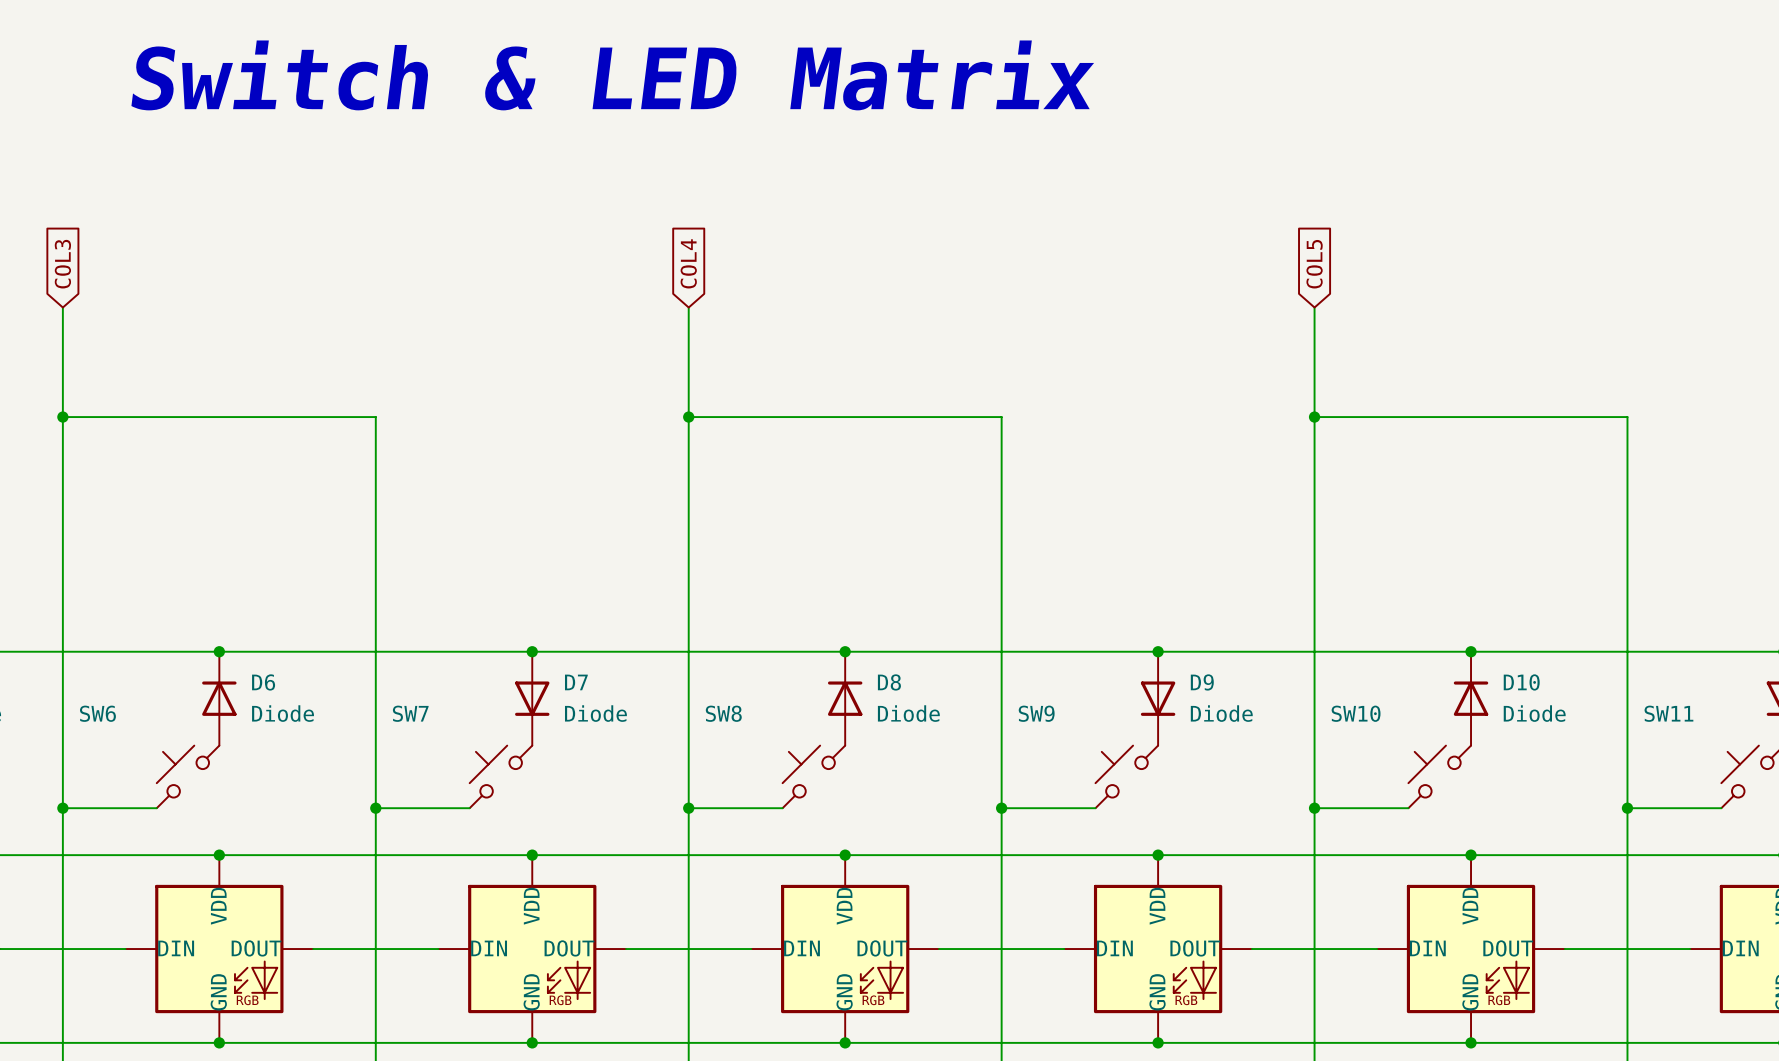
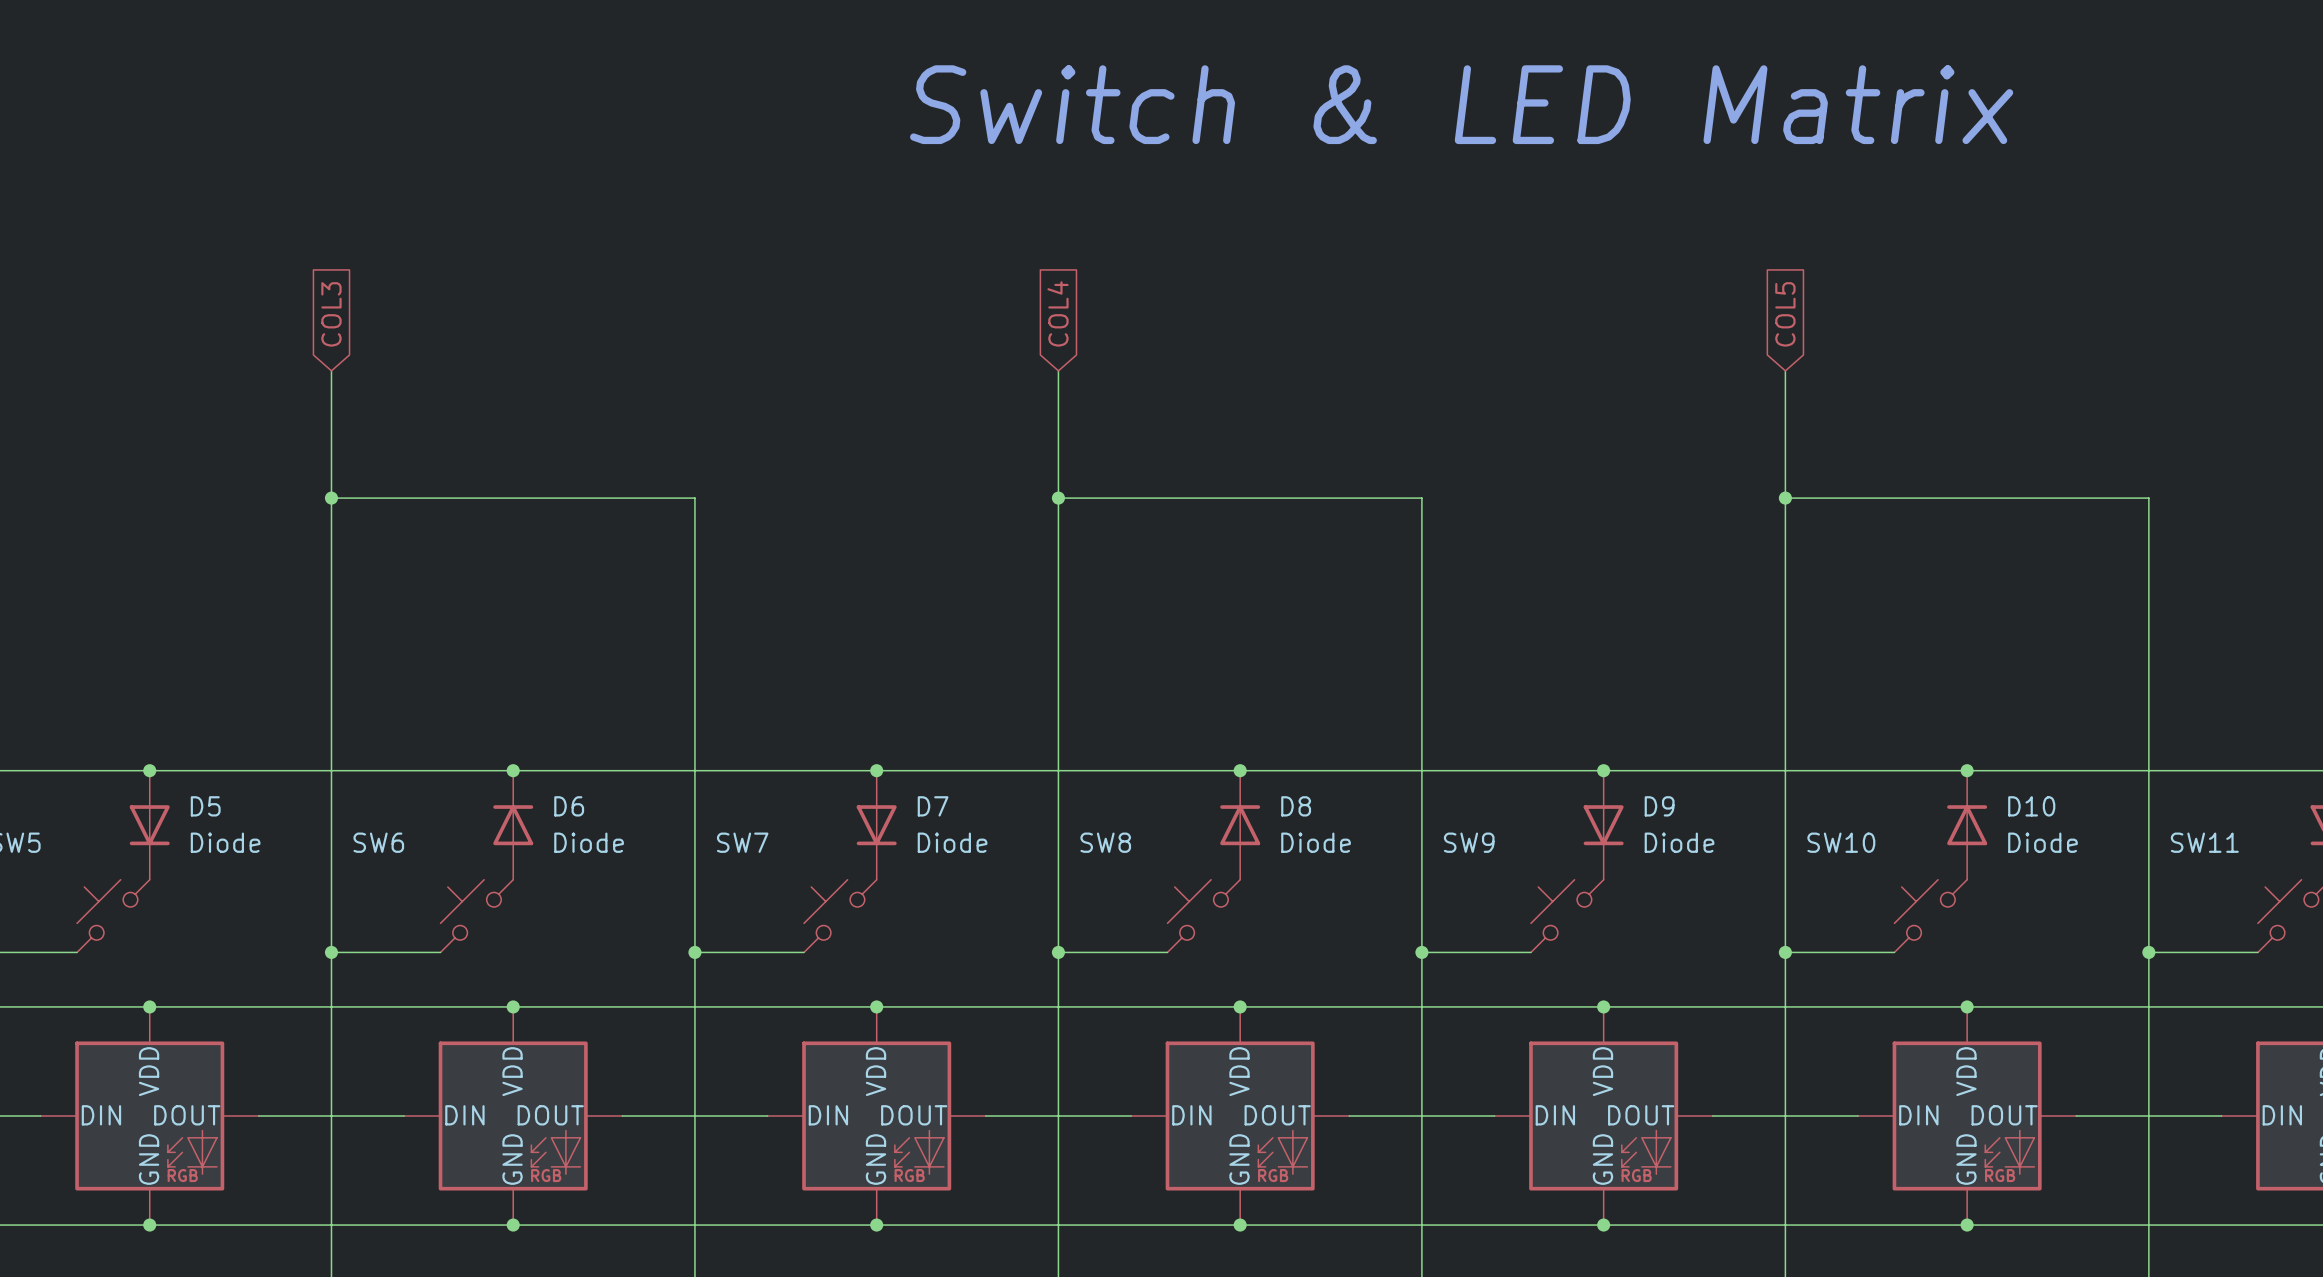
text: Switch & LED Matrix (612, 75) -> none
text: none -> Switch & LED Matrix (1461, 104)

